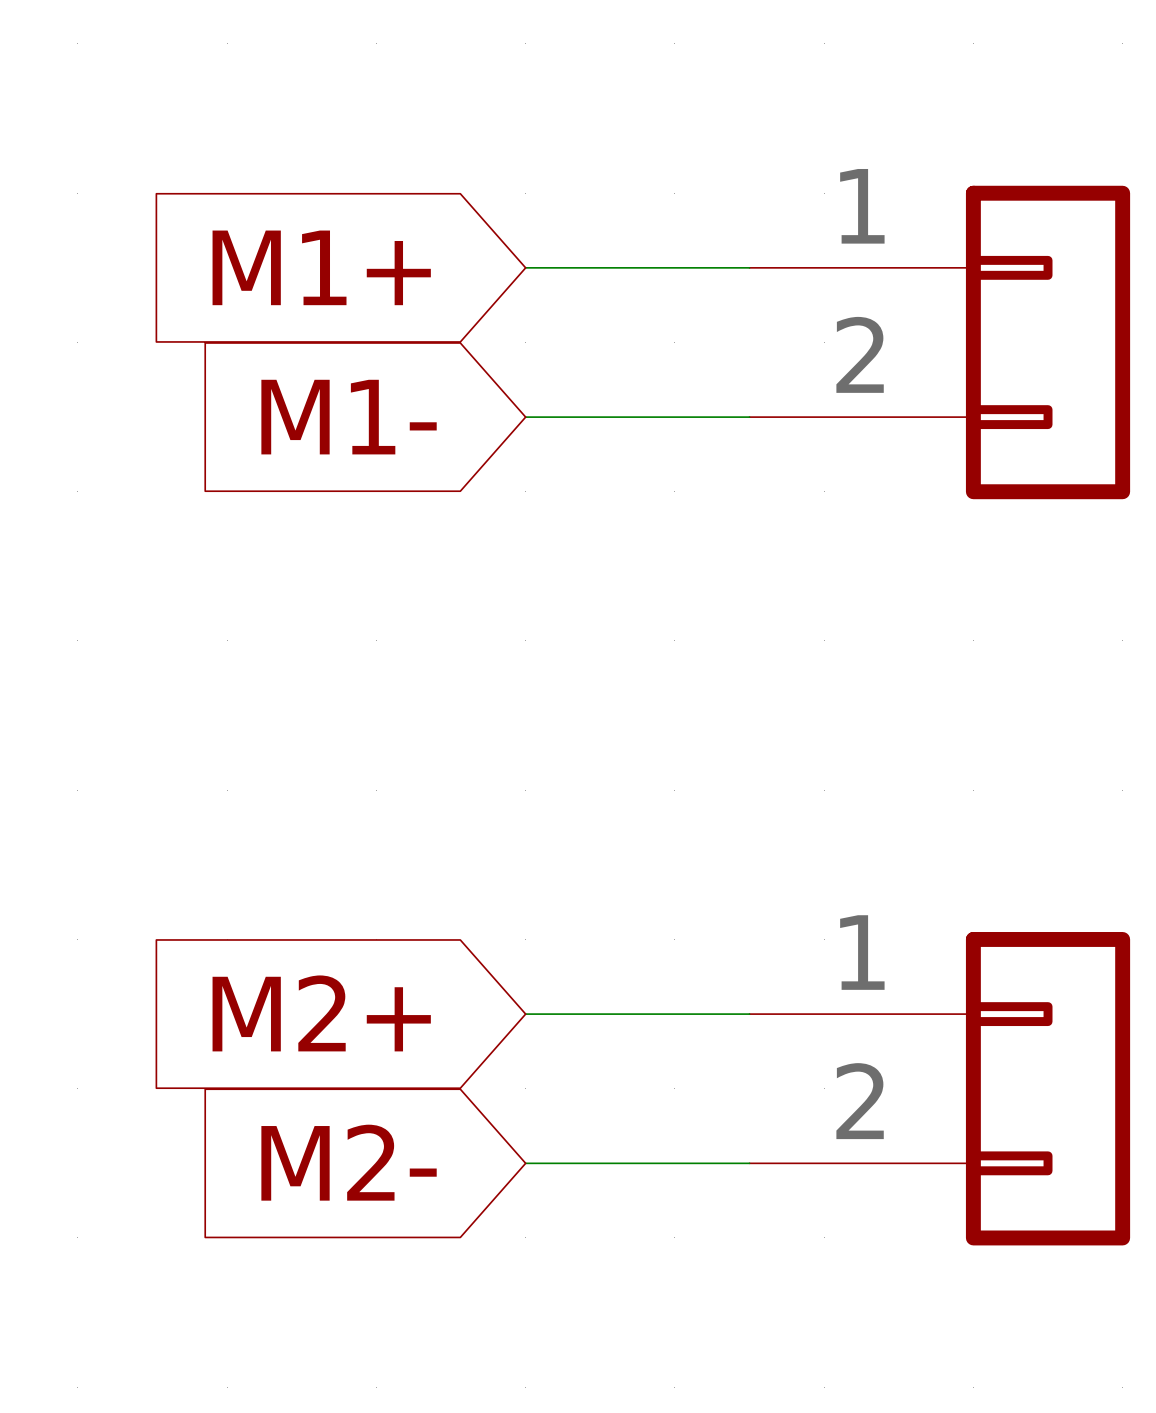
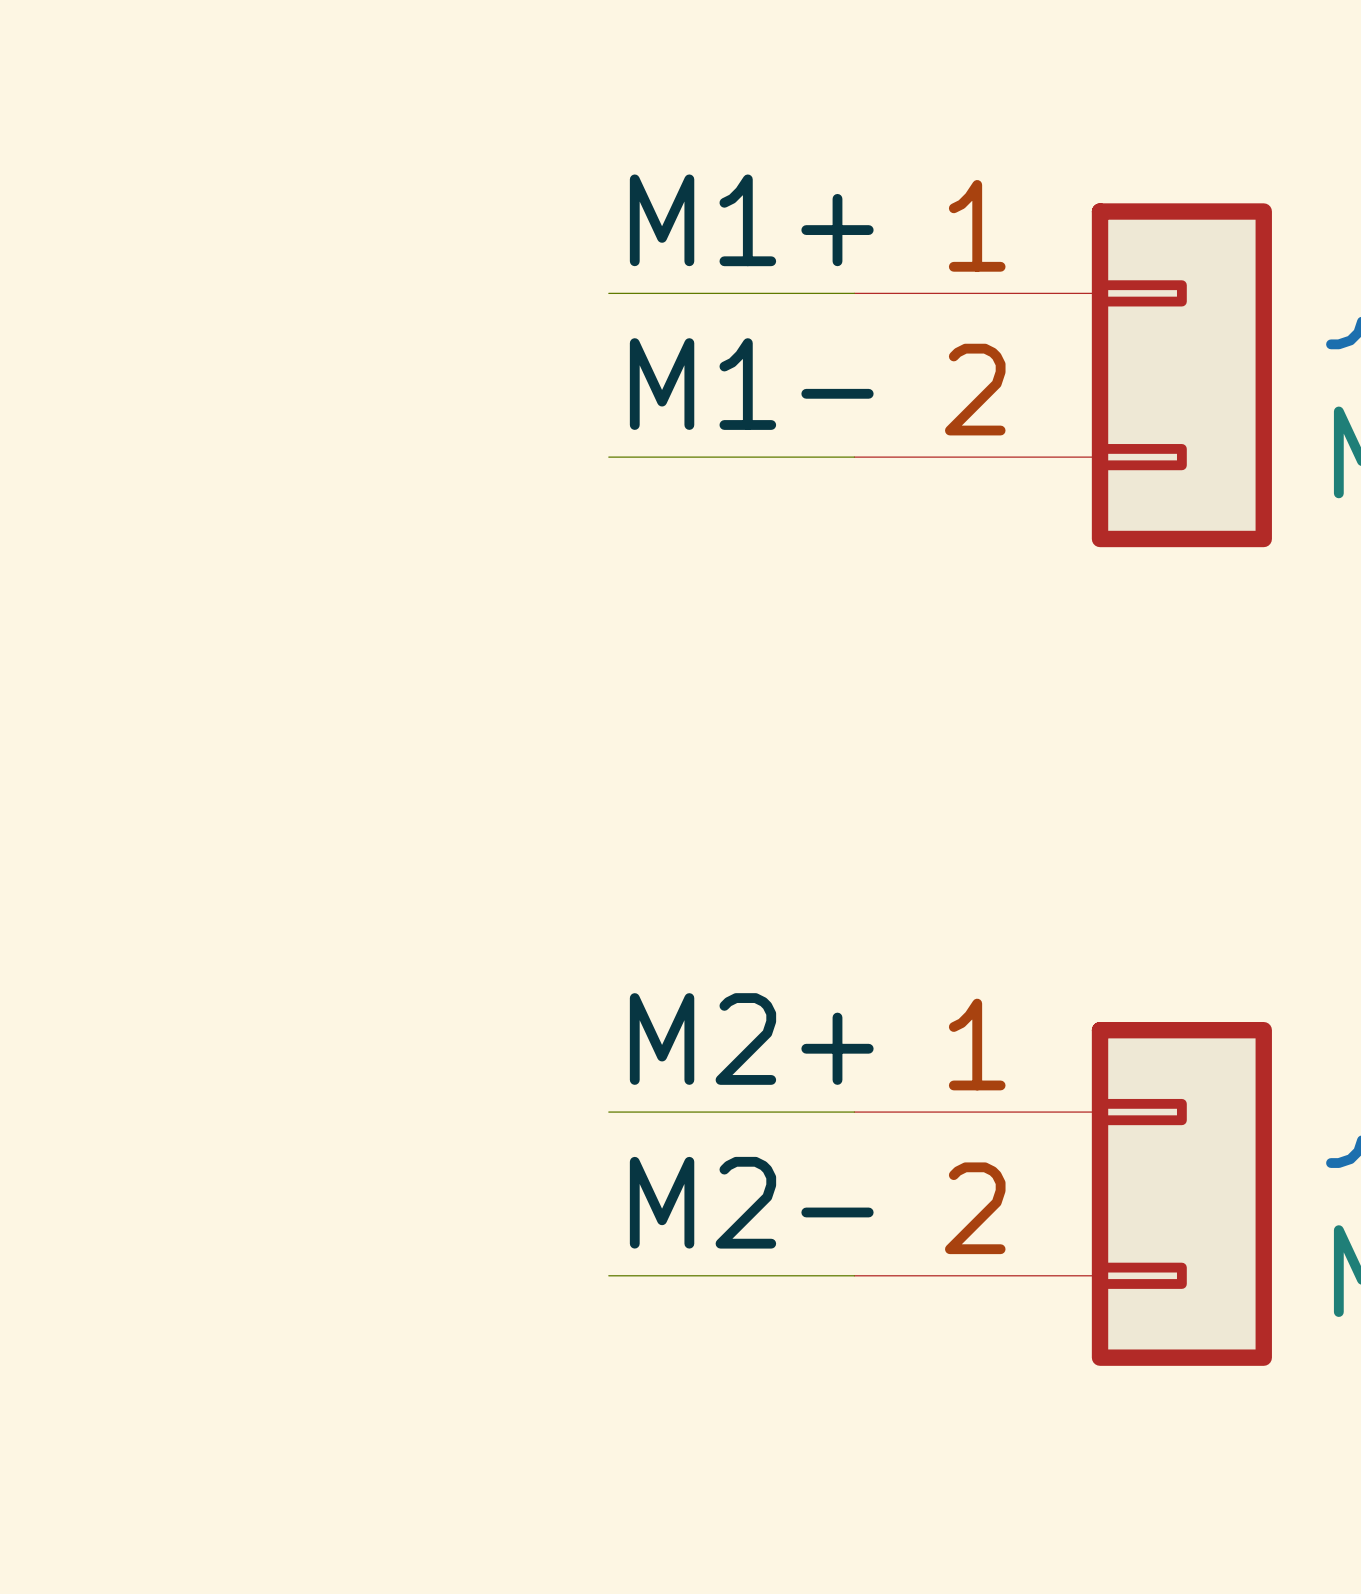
label: none -> M1+ (751, 220)
global label: M1+ (321, 267) -> none
label: none -> M1- (751, 384)
global label: M1- (349, 417) -> none
label: none -> M2+ (751, 1039)
global label: M2+ (321, 1013) -> none
label: none -> M2- (751, 1202)
global label: M2- (349, 1162) -> none

